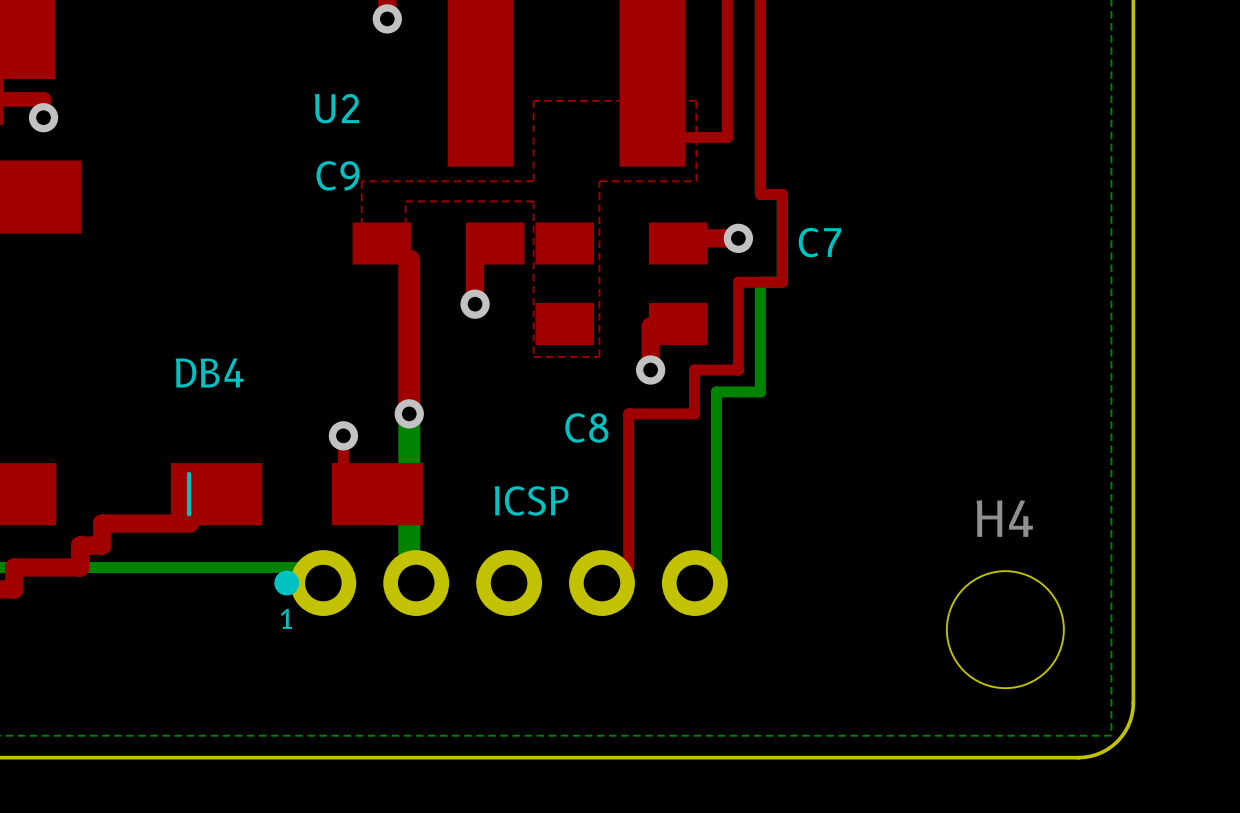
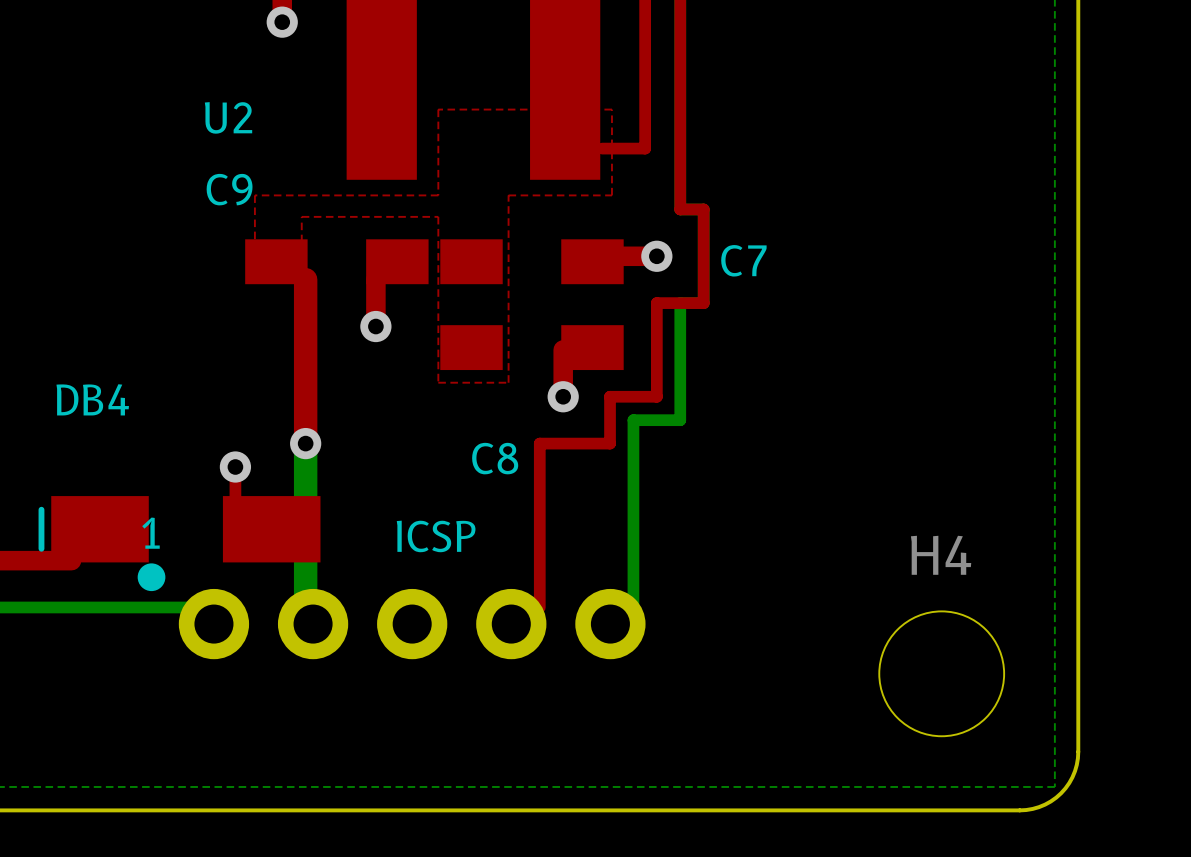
line: (189, 474) (189, 514) -> none
line: none -> (41, 509) (41, 548)
drawing: none -> [137, 563, 166, 592]
drawing: [274, 570, 300, 596] -> none
text position: 1 (286, 618) -> 1 (150, 533)

